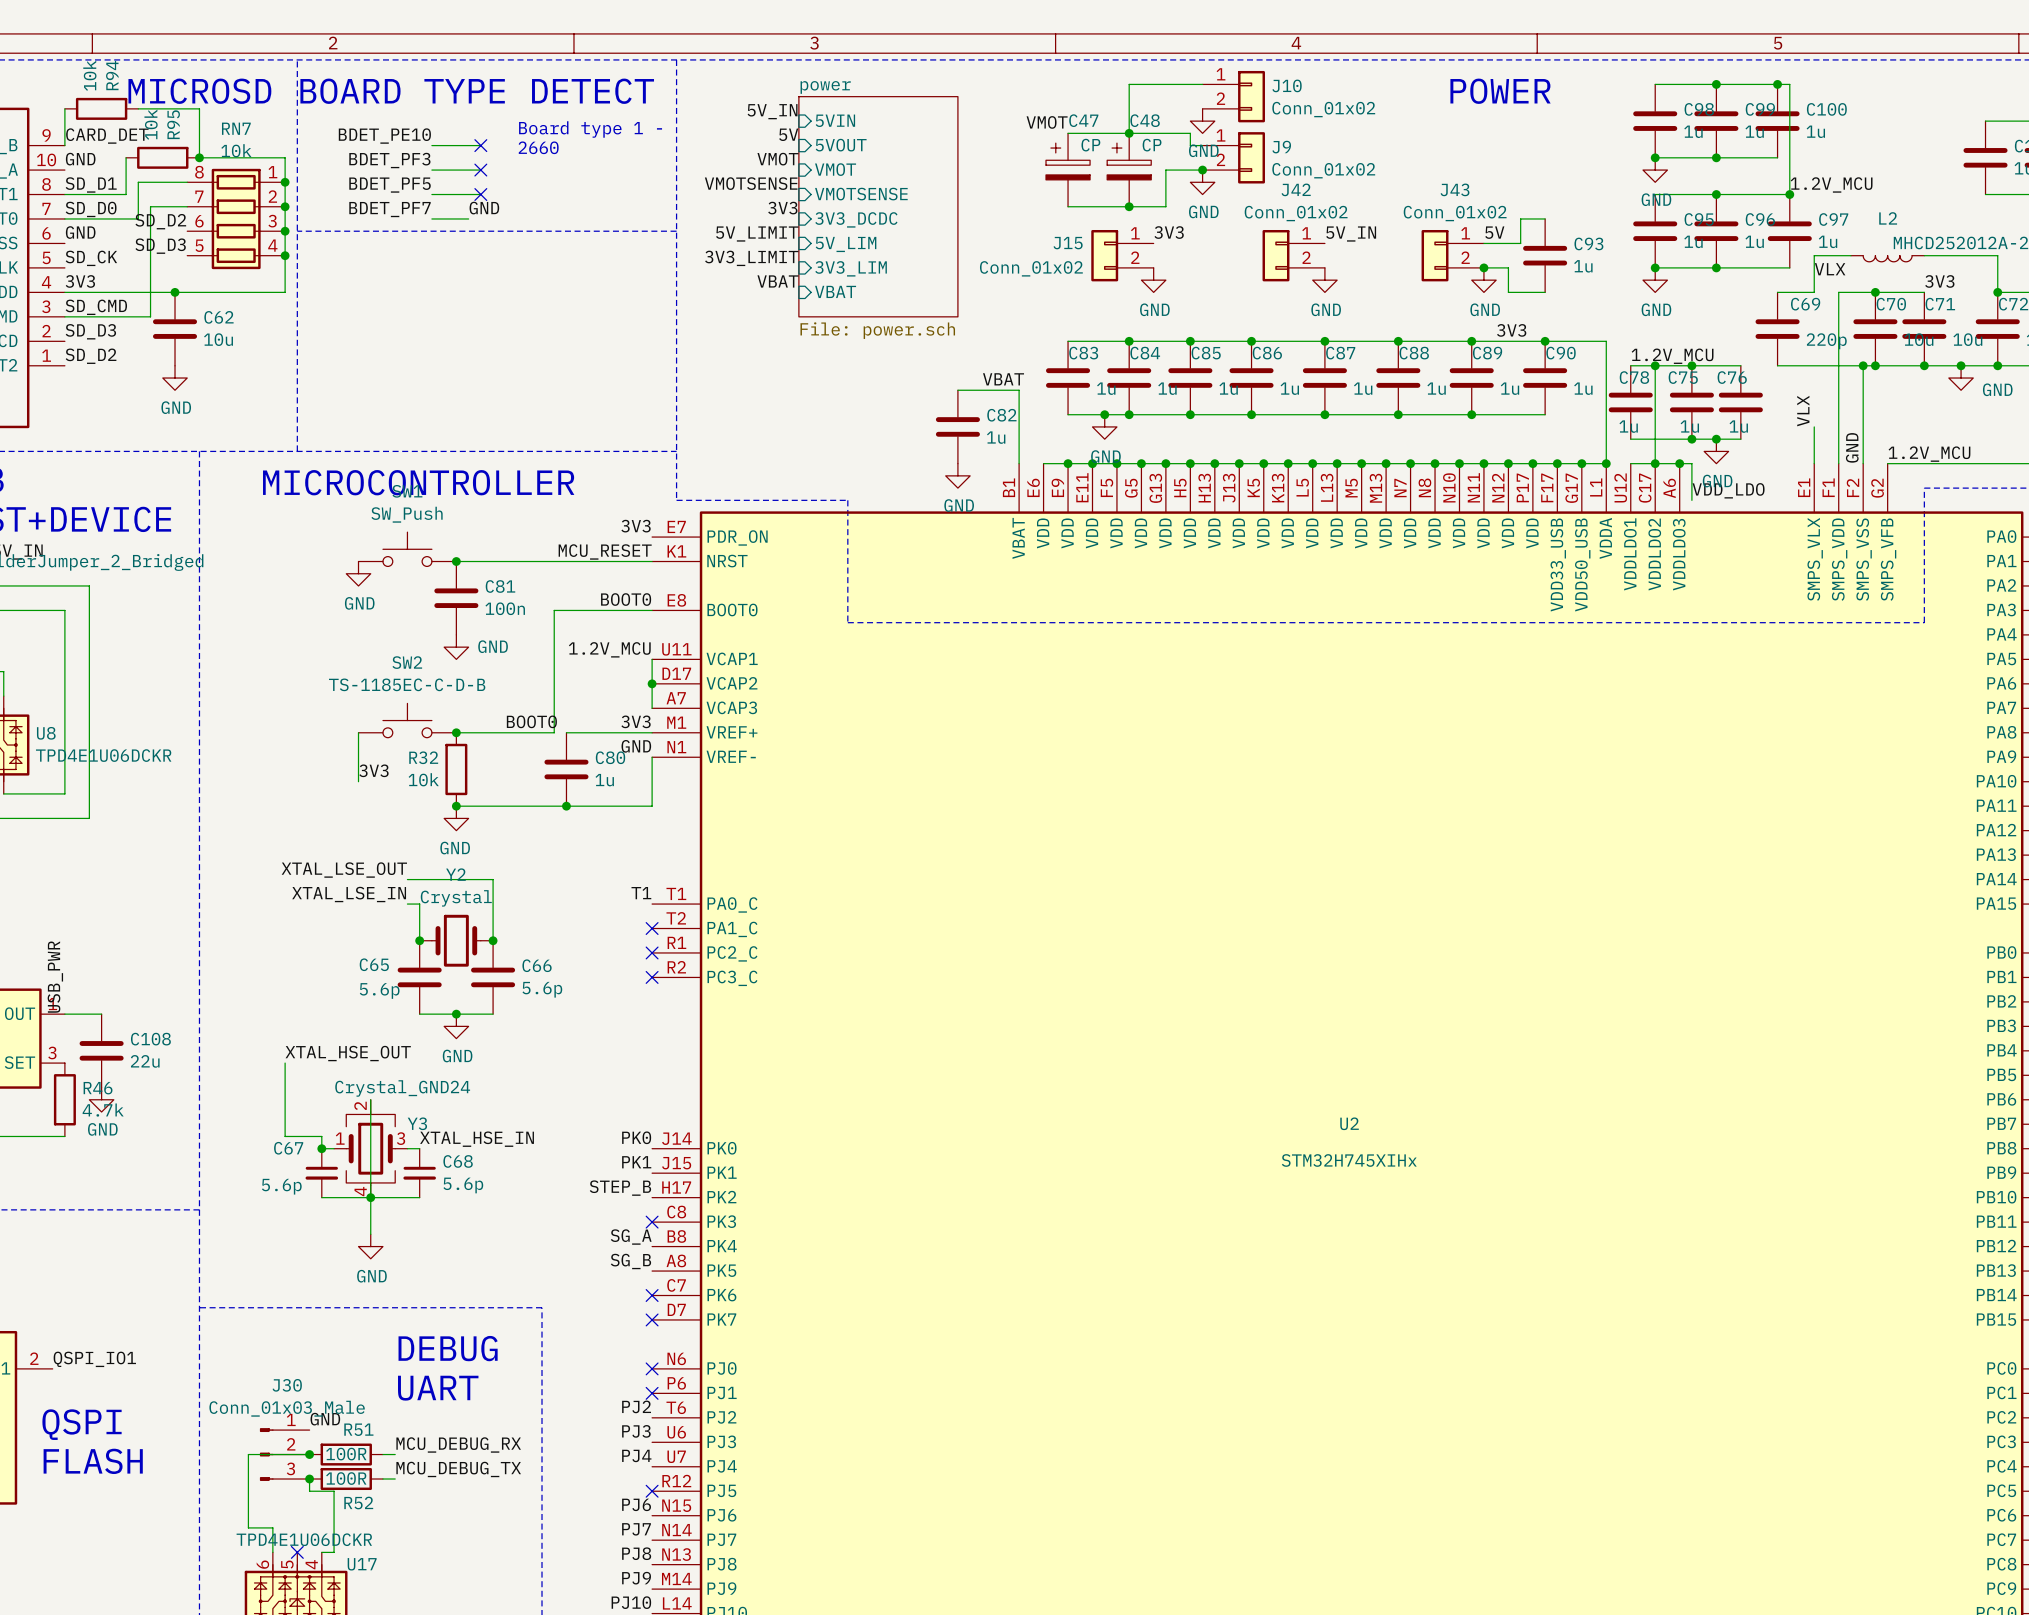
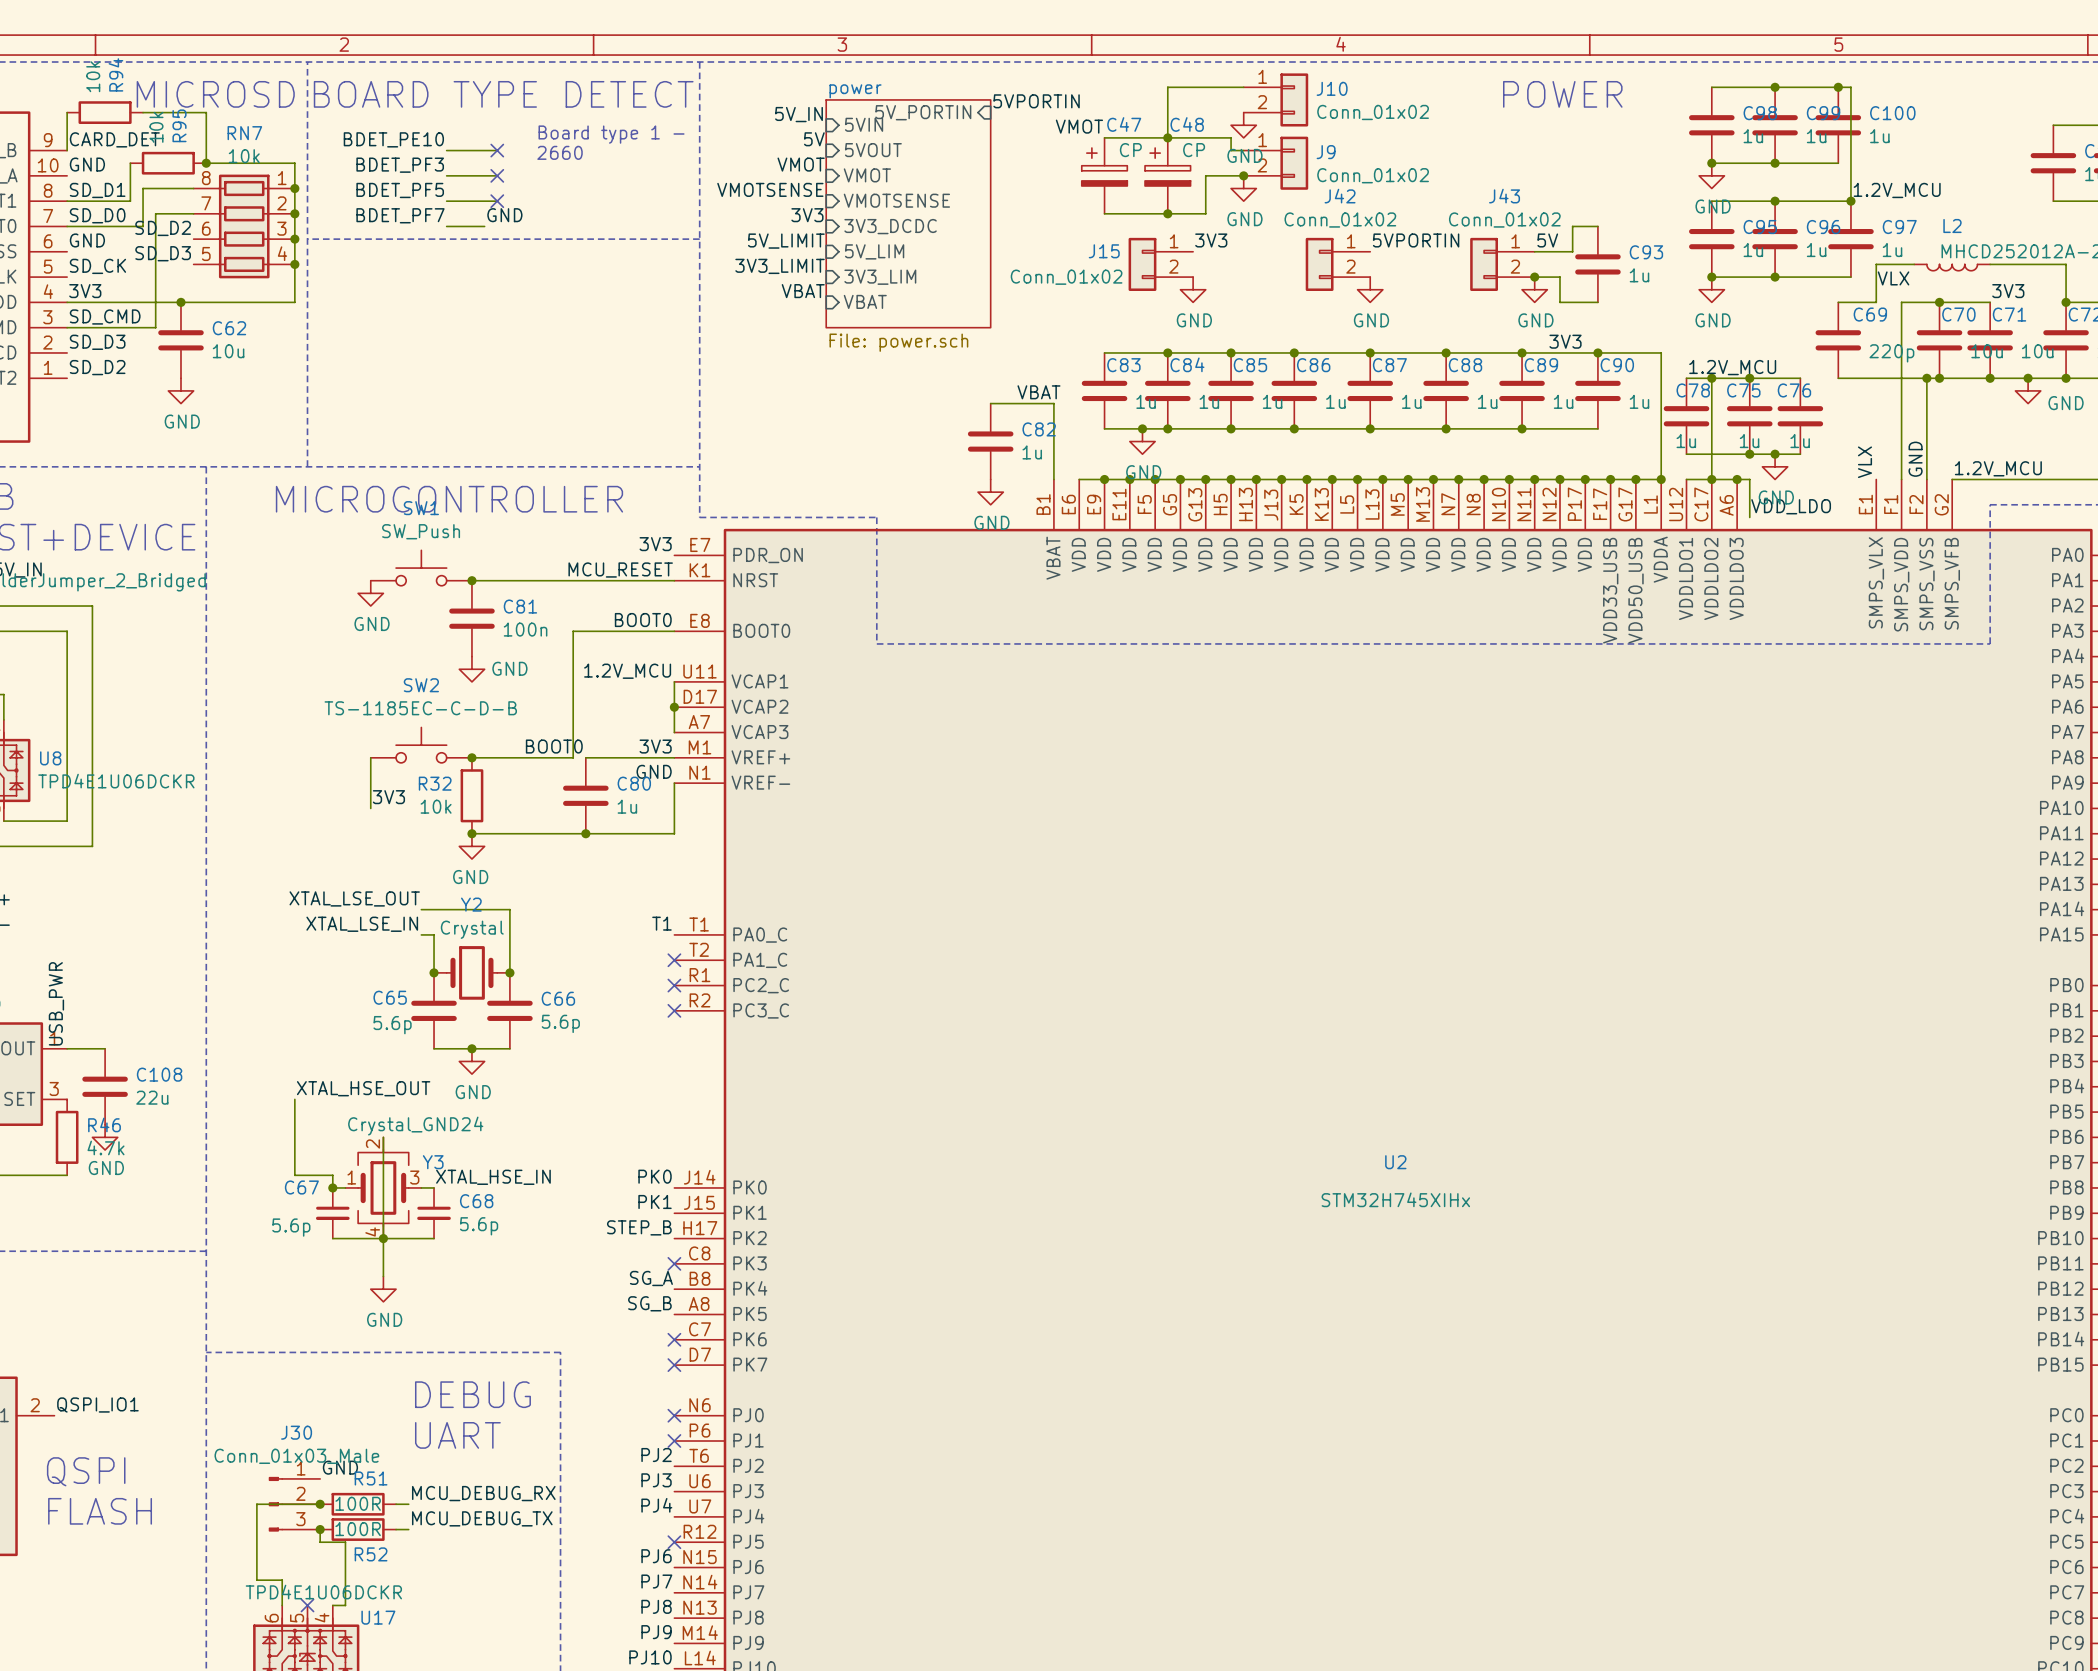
label: none -> 5VPORTIN (1036, 101)
sheet pin: none -> 5V_PORTIN (923, 112)
label: 5V_IN (1351, 234) -> 5VPORTIN (1416, 240)
label position: VLX (1803, 411) -> VLX (1864, 462)
wire: (1814, 426) (1814, 463) -> none

